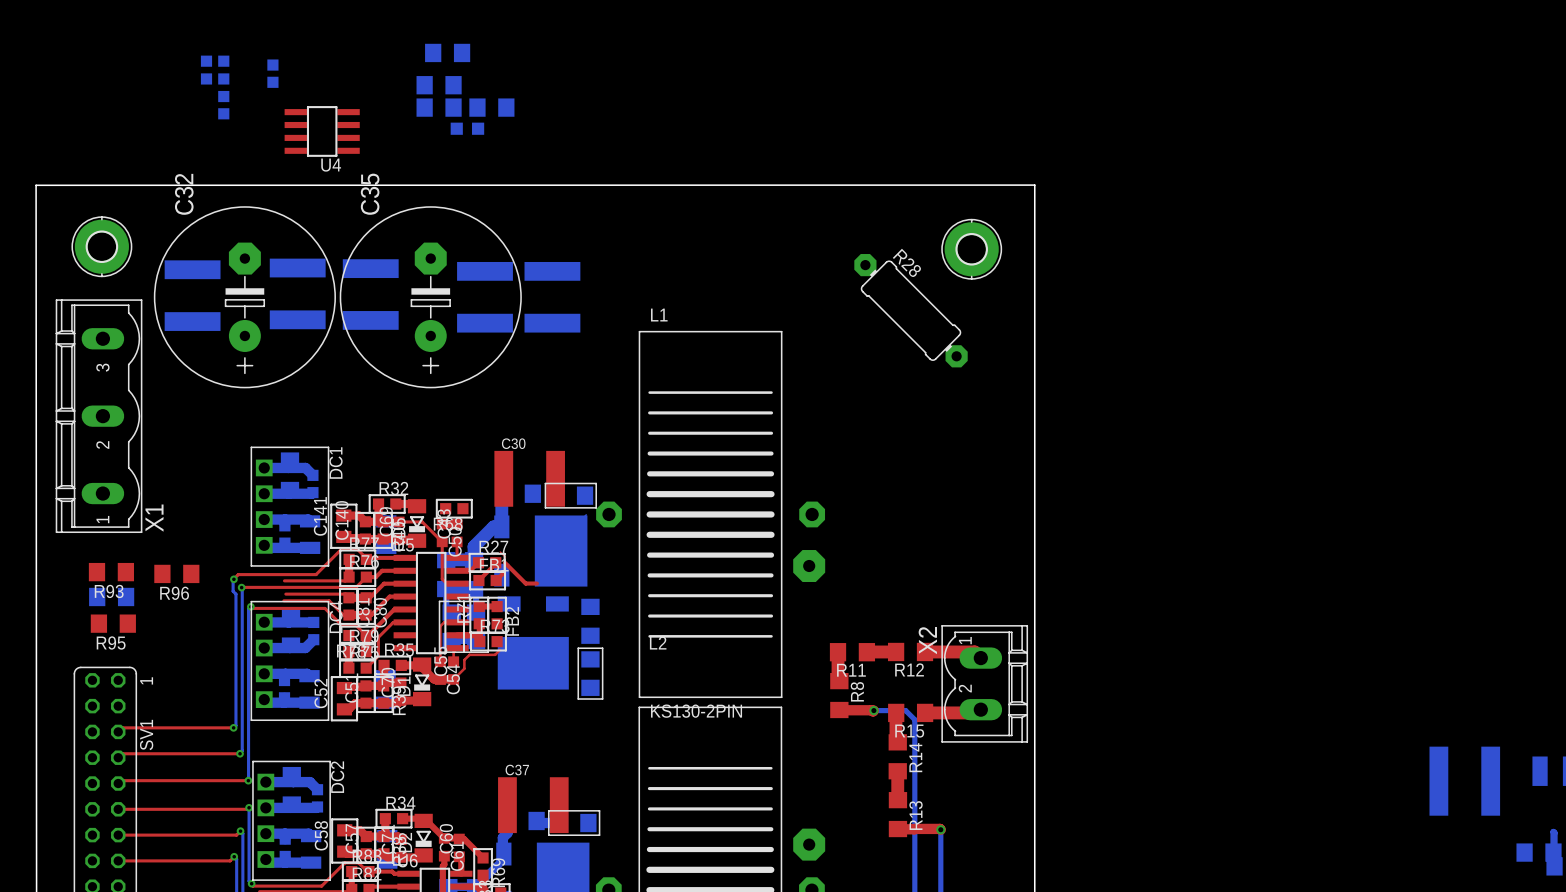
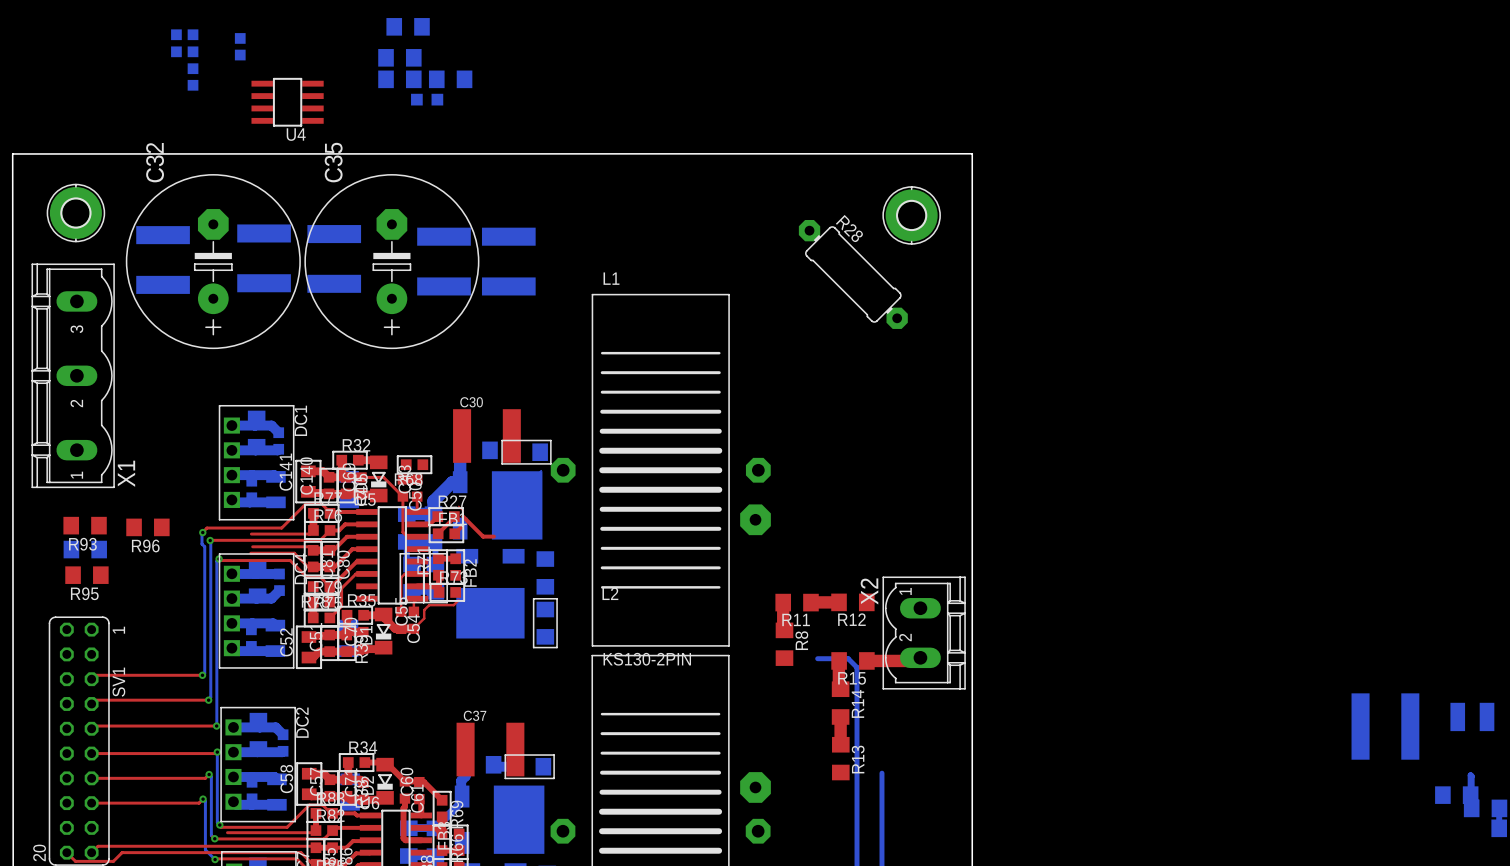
top track: (925, 651) (974, 651) (980, 658) -> none
top track: (839, 710) (873, 710) -> none
via: (873, 710) -> none
top track: (897, 829) (940, 829) -> none
via: (940, 829) -> none

